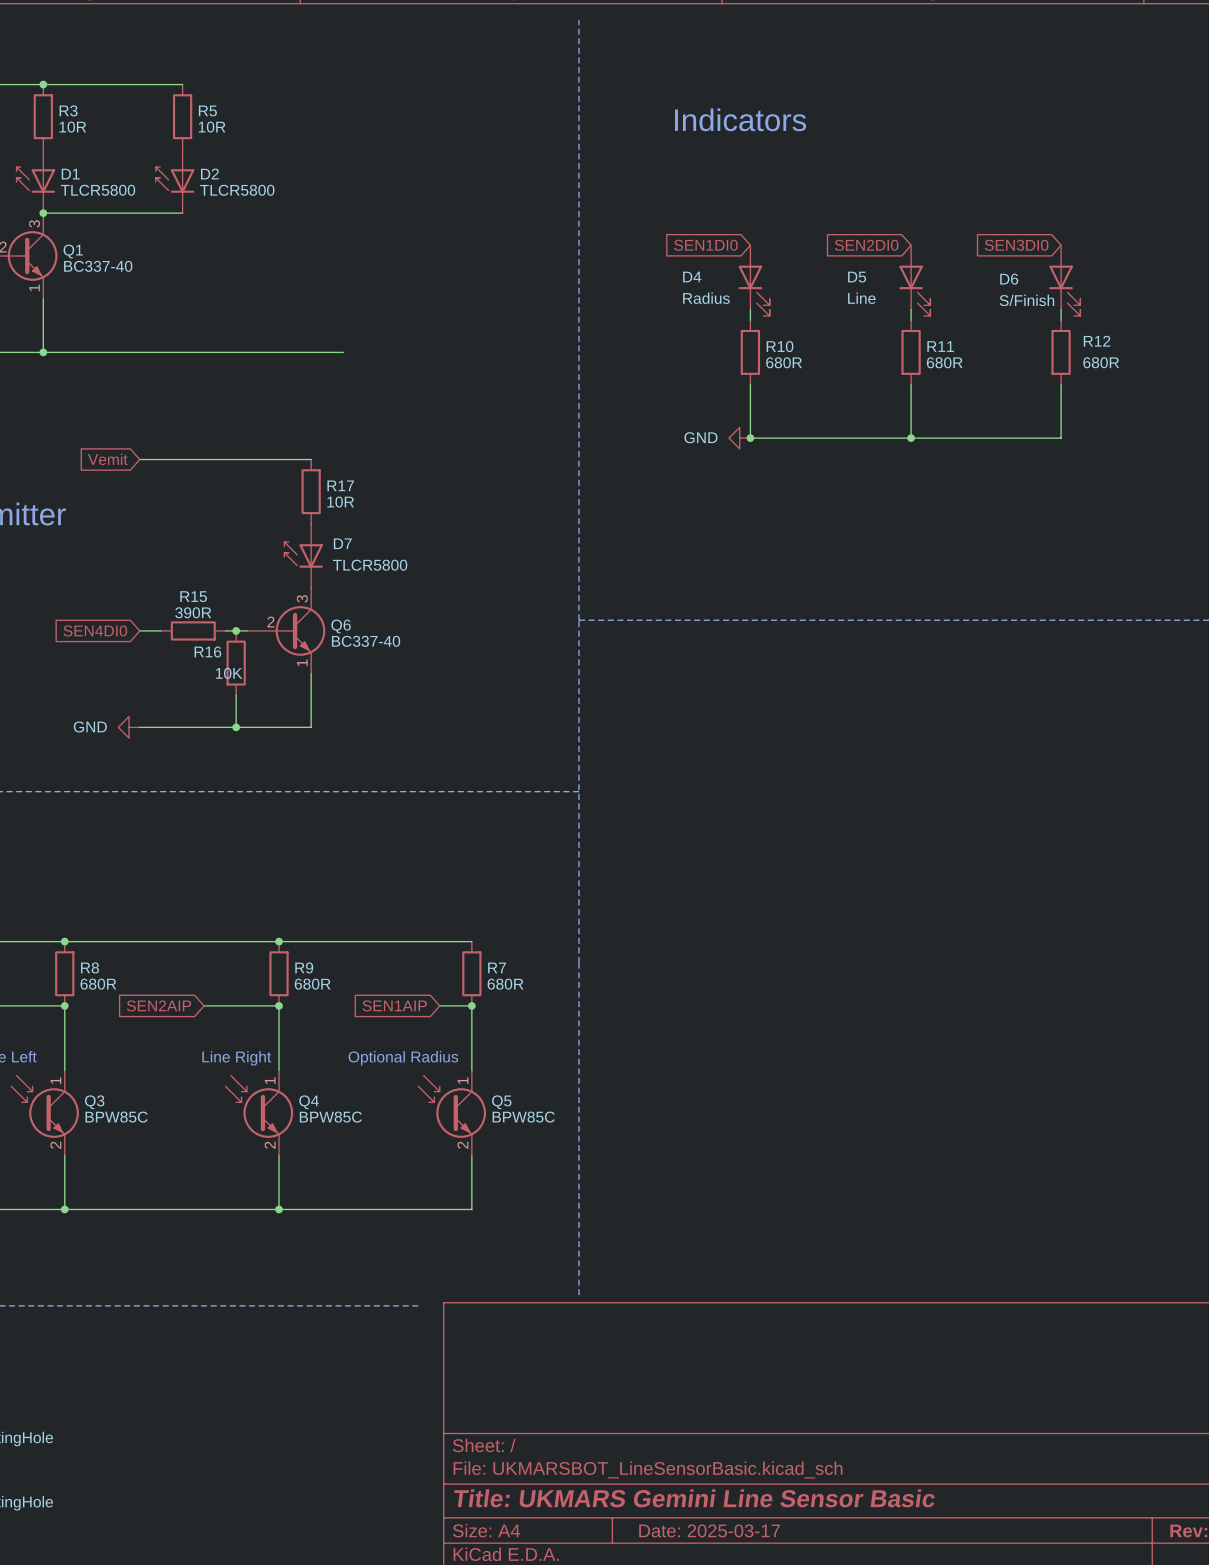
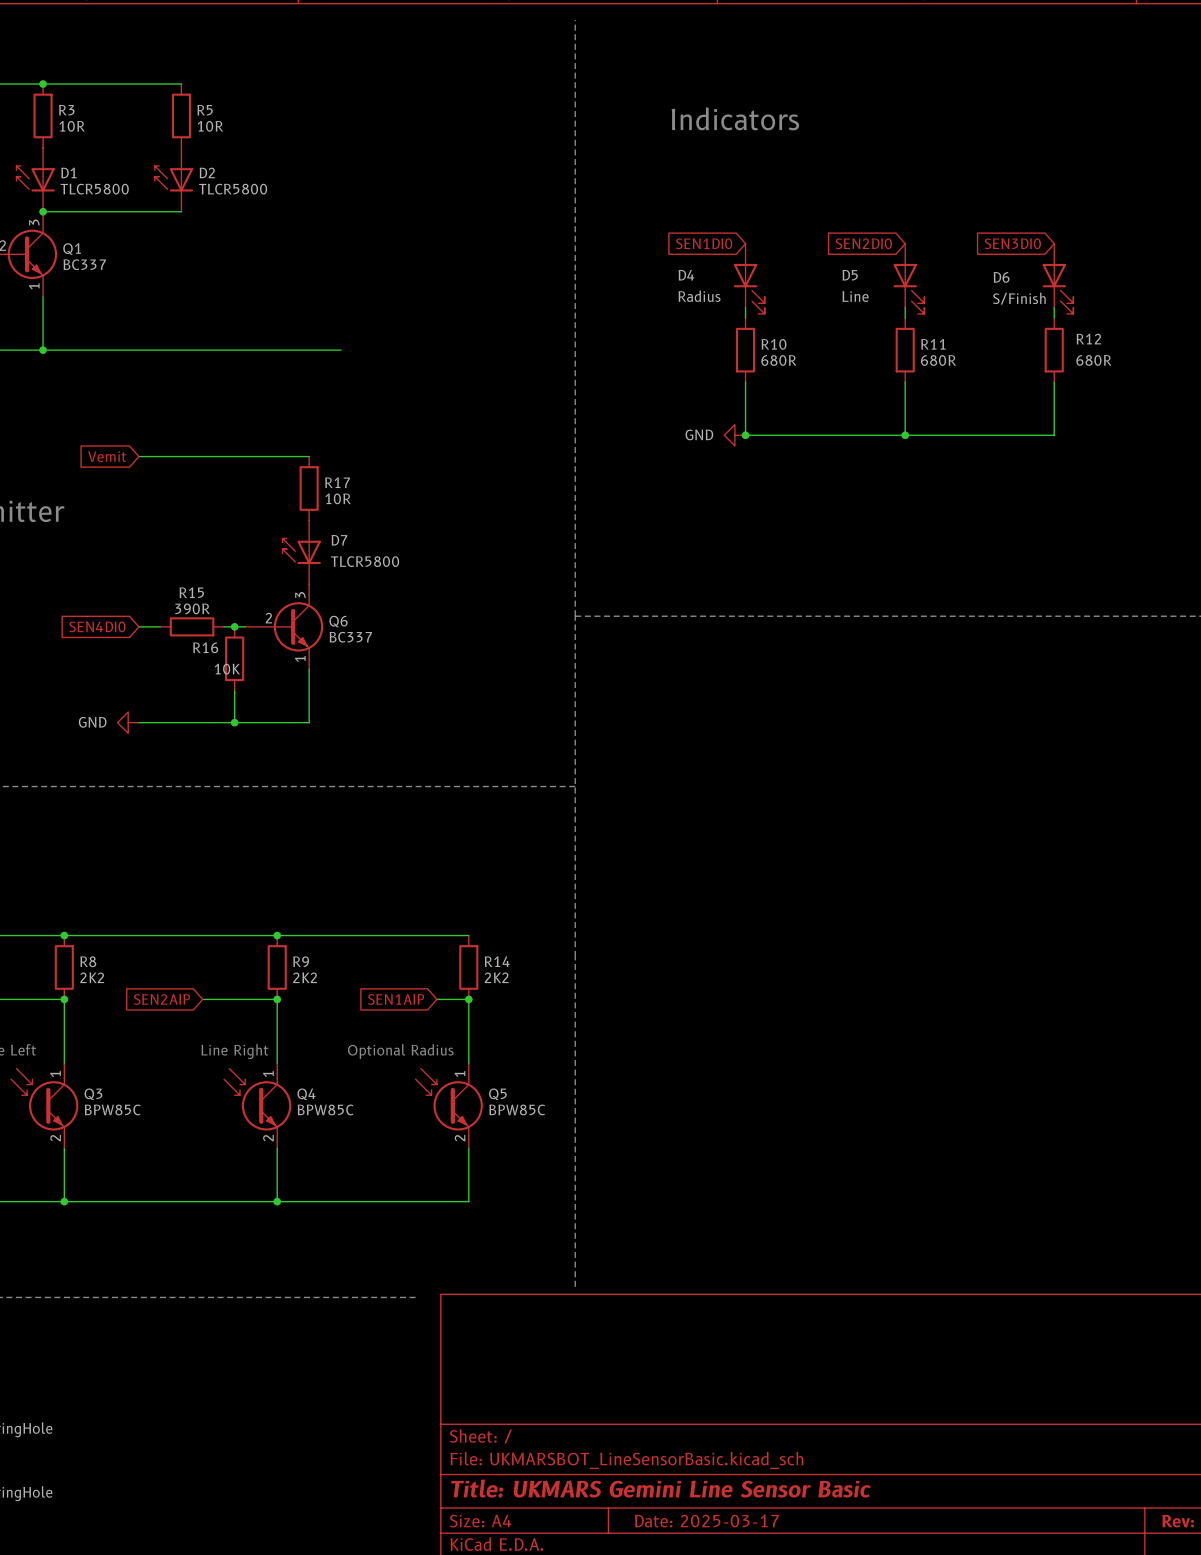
Q1 value: BC337-40 (98, 266) -> BC337 (84, 264)
Q6 value: BC337-40 (366, 641) -> BC337 (350, 637)
R7 name: R7 (497, 967) -> R14 (497, 961)
R8 value: 680R (98, 984) -> 2K2 (92, 977)
R9 value: 680R (312, 984) -> 2K2 (305, 977)
R7 value: 680R (505, 984) -> 2K2 (496, 977)

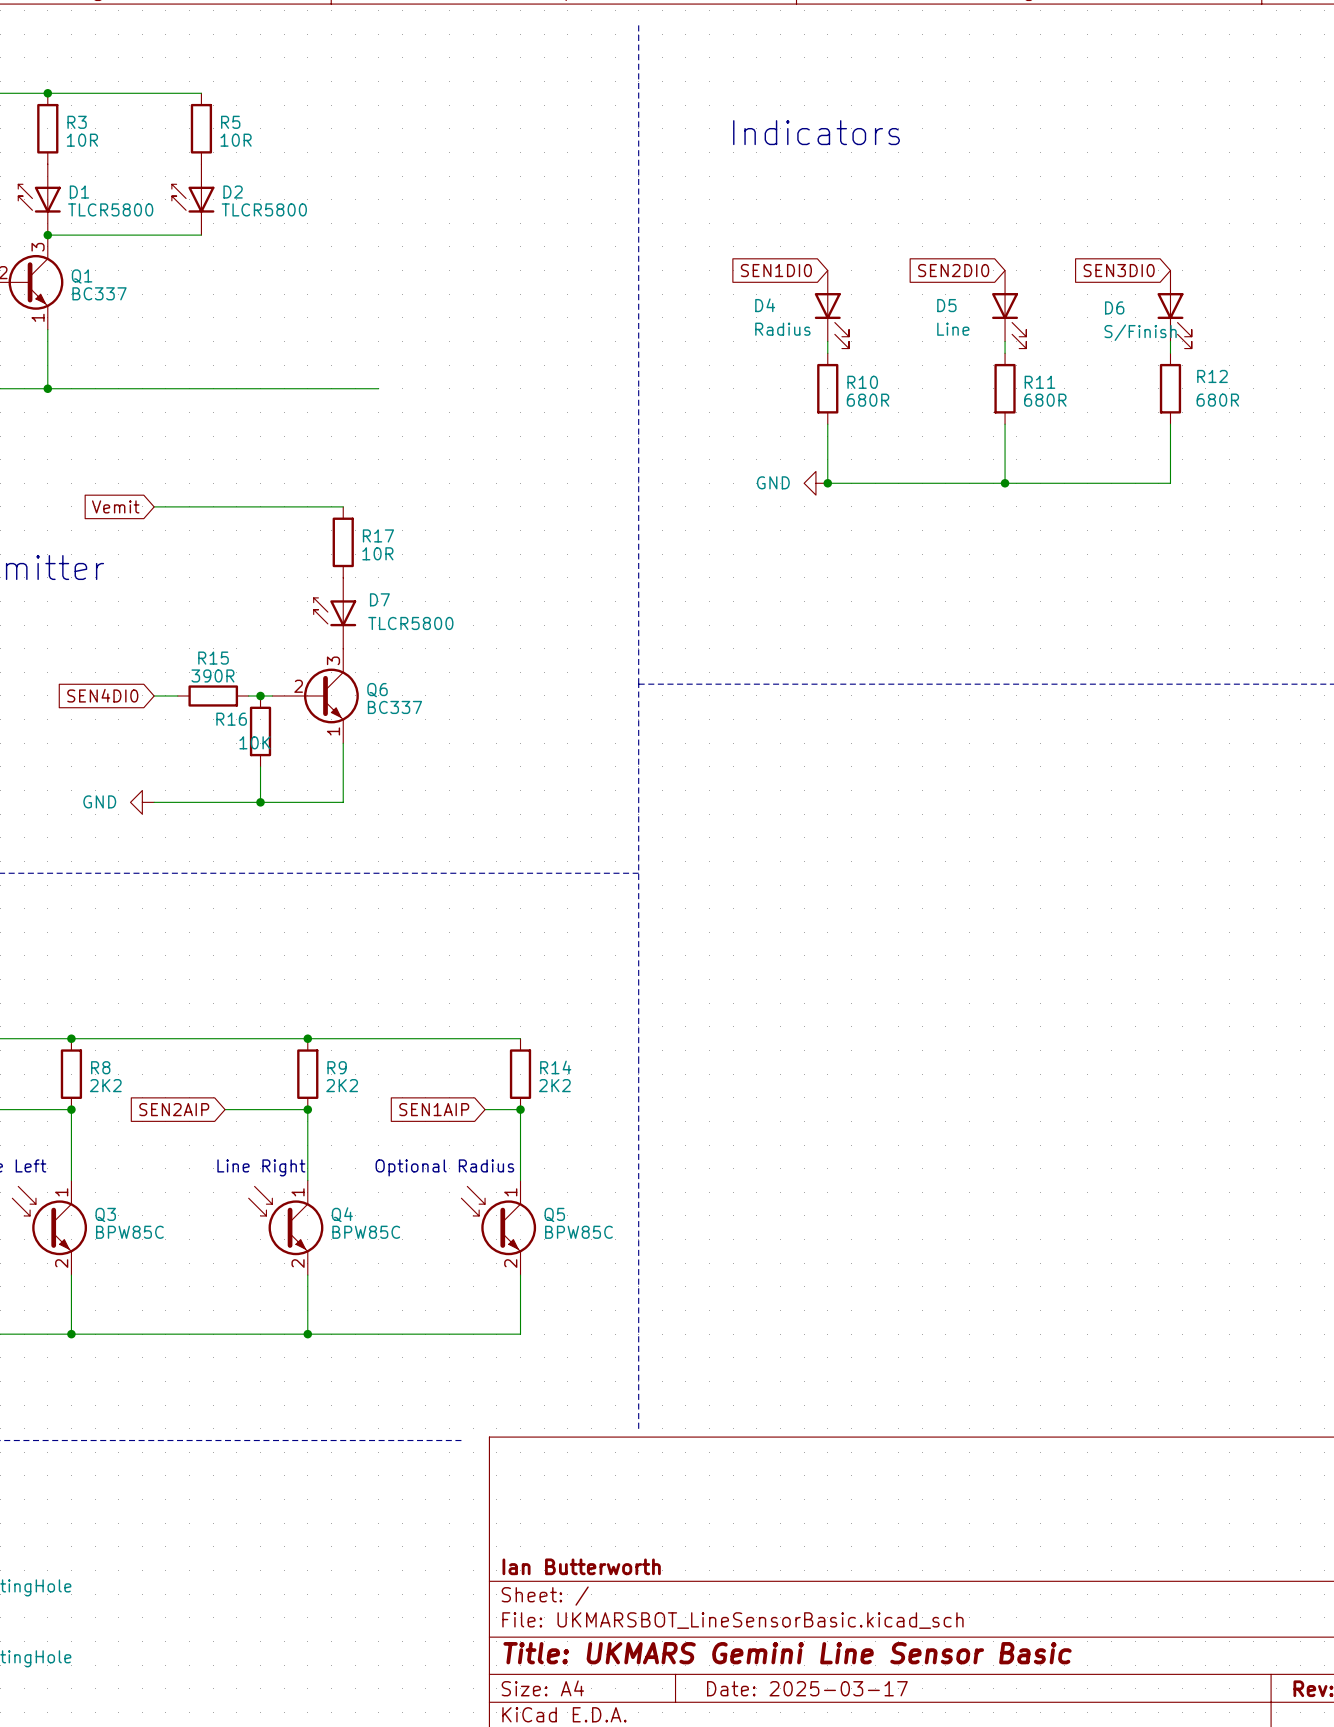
title block: none -> Ian Butterworth (581, 1566)

